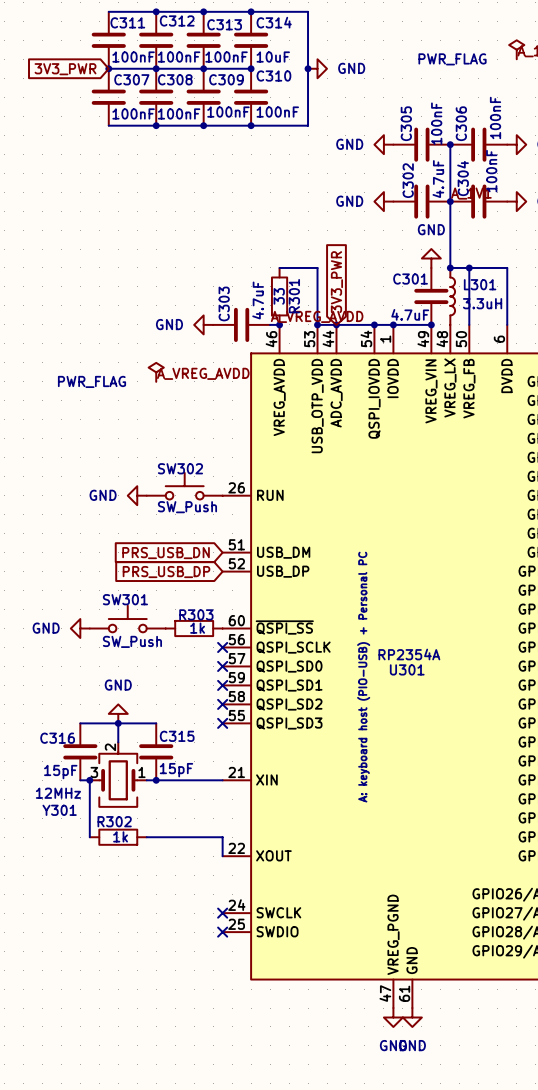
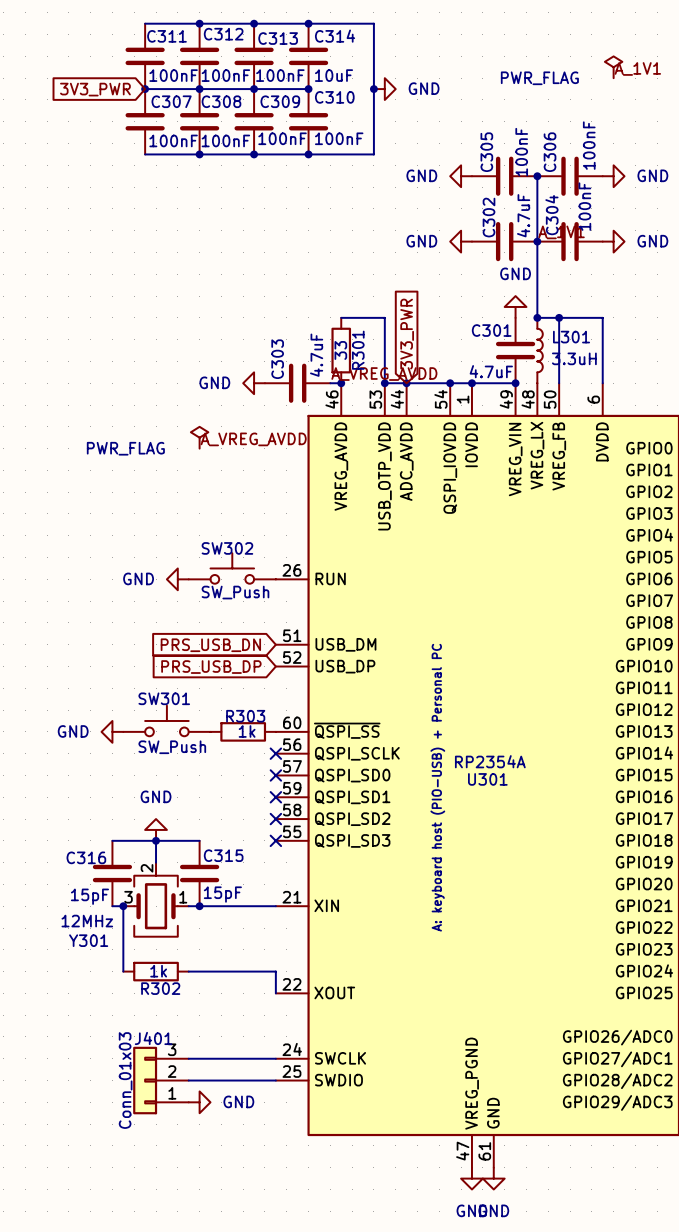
R302 name position: R302 (114, 821) -> R302 (160, 988)
wire: none -> (188, 1058) (275, 1058)
no-connect mark: (222, 913) -> none
J401: none -> Conn_01x03 (160, 1080)
wire: none -> (188, 1080) (275, 1080)
no-connect mark: (222, 932) -> none
power symbol: none -> GND (199, 1102)

